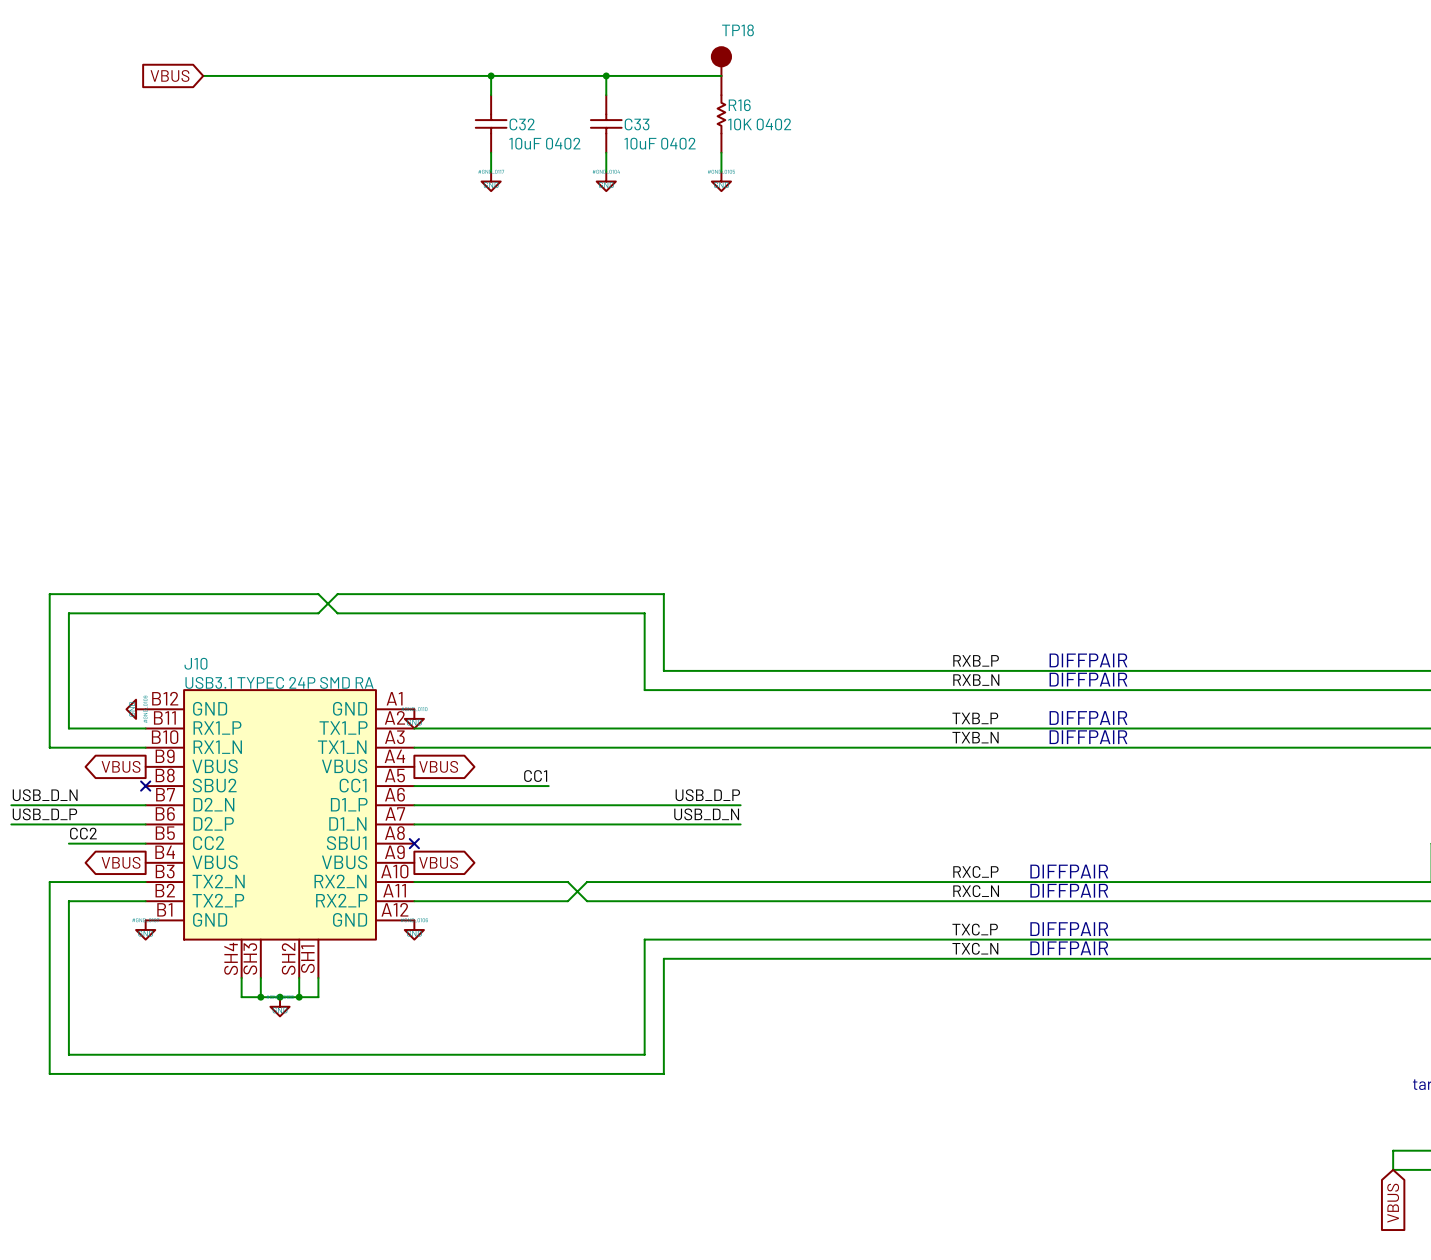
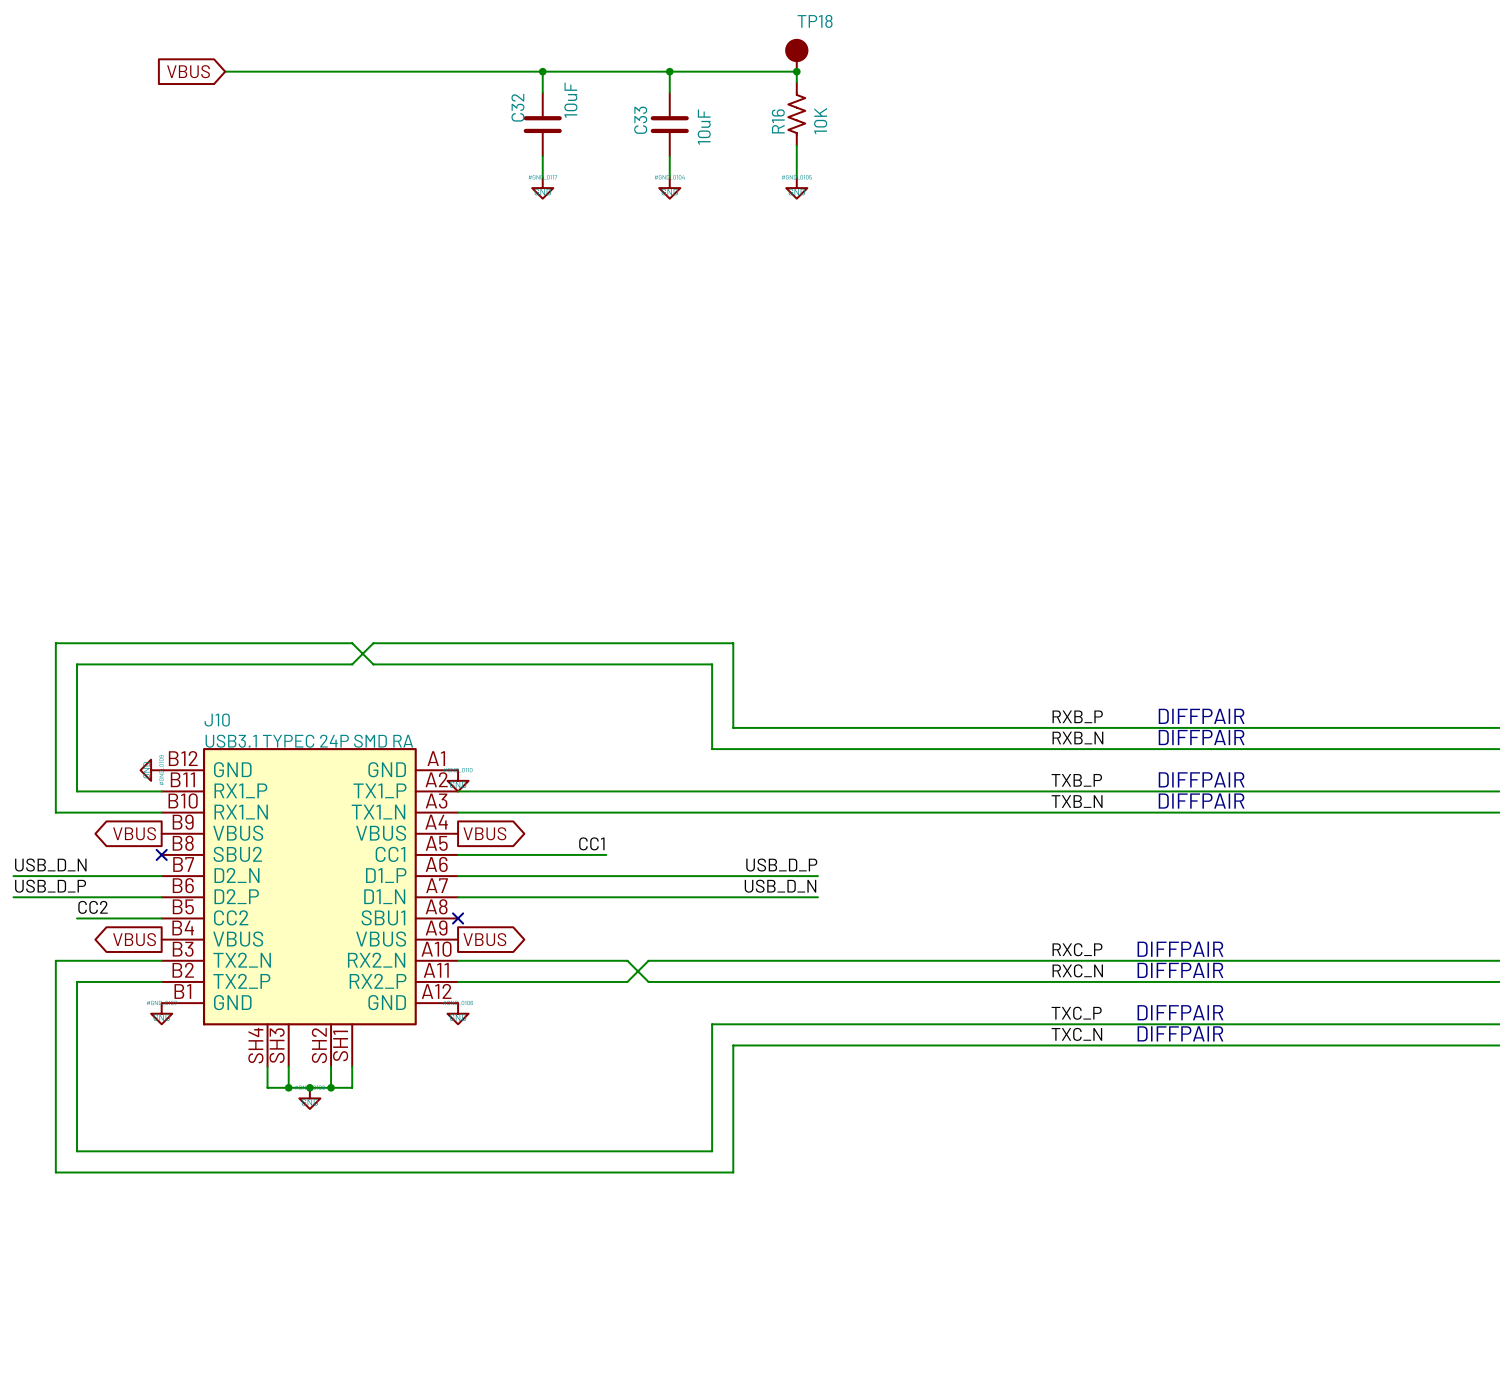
R16 symbol: [716, 75, 727, 153] -> [788, 82, 806, 146]
junction: none -> (796, 71)
C32 symbol: [474, 95, 508, 153] -> [523, 92, 562, 157]
C33 symbol: [589, 95, 623, 153] -> [650, 92, 689, 157]
R16 name position: R16 (739, 105) -> R16 (778, 121)
C32 name position: C32 (522, 124) -> C32 (517, 107)
C33 name position: C33 (637, 124) -> C33 (640, 120)
R16 value: 10K 0402 (759, 124) -> 10K (820, 121)
C32 value: 10uF 0402 (544, 143) -> 10uF (570, 100)
C33 value: 10uF 0402 (660, 143) -> 10uF (704, 127)

